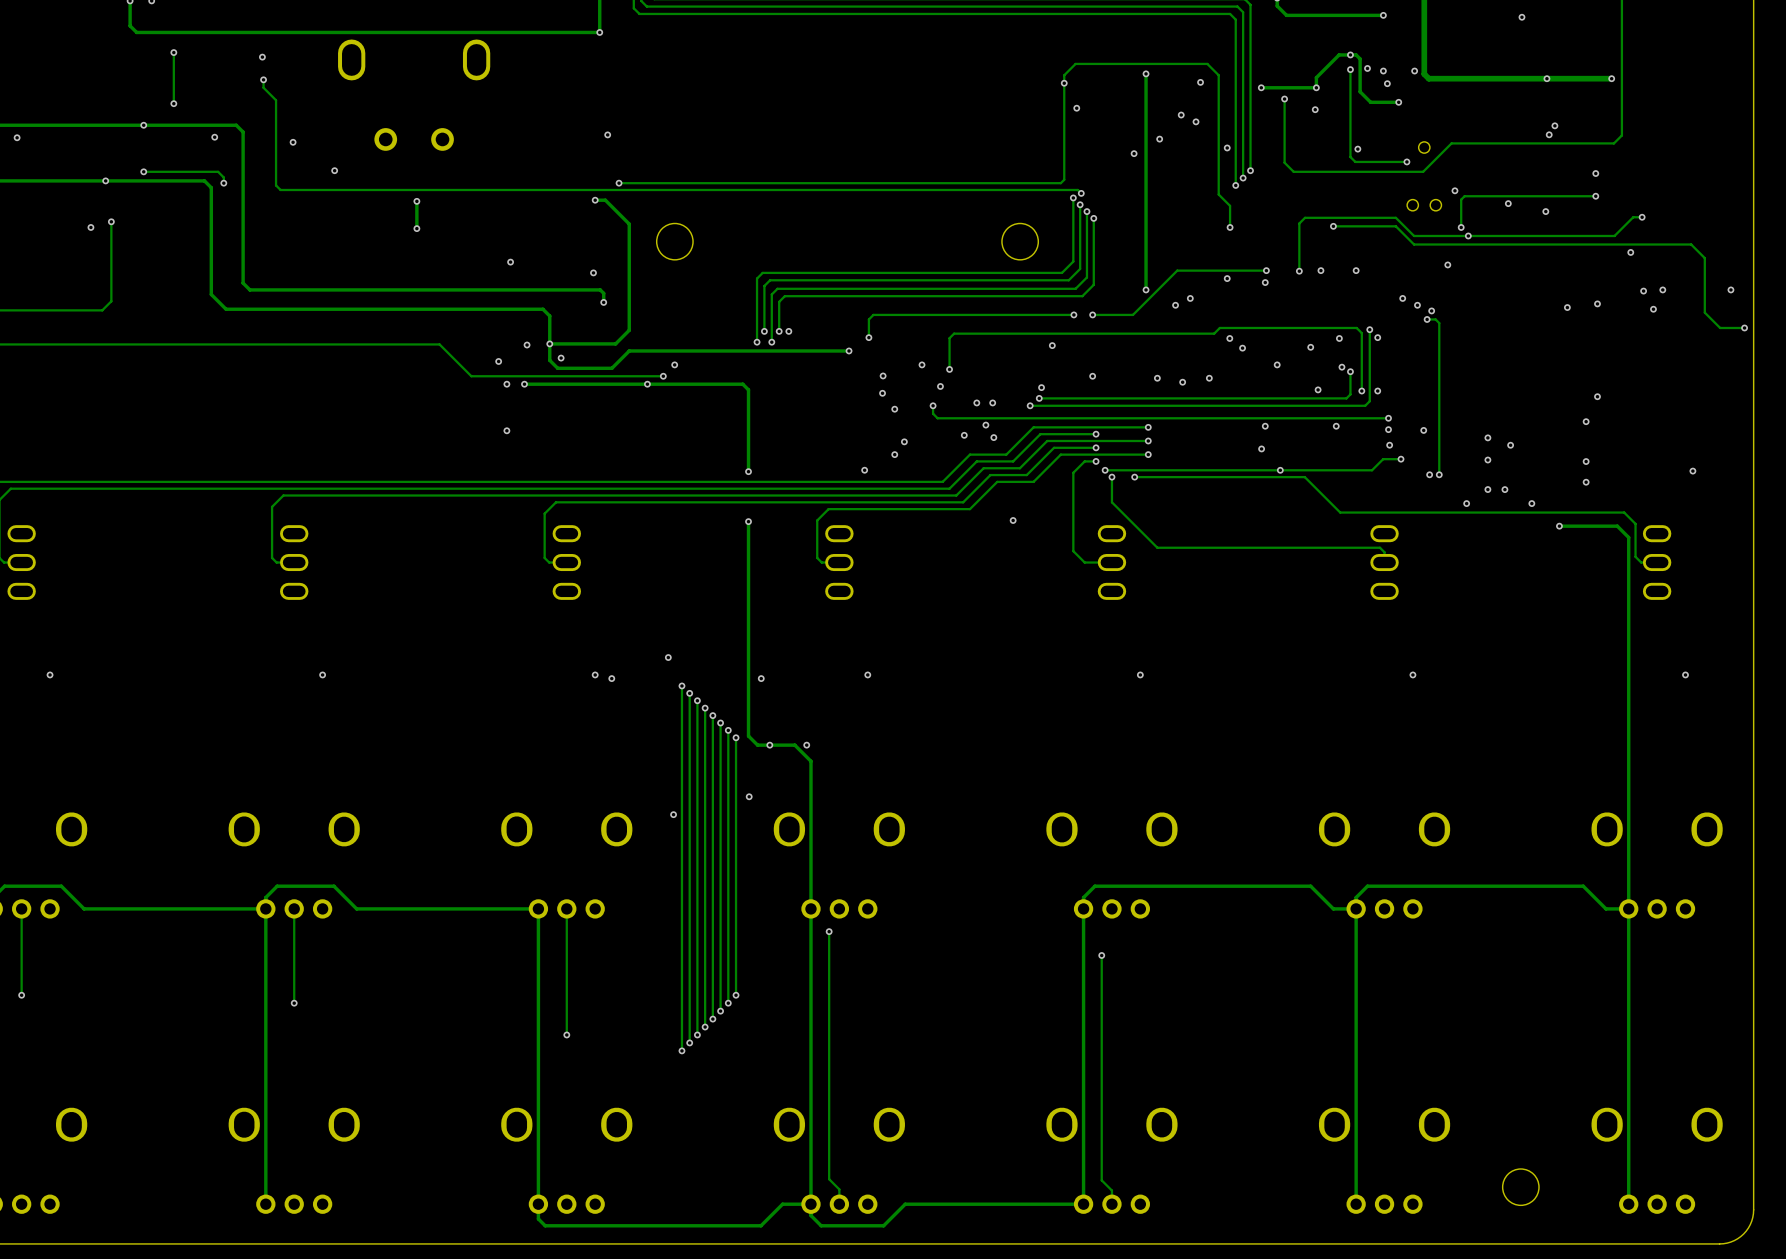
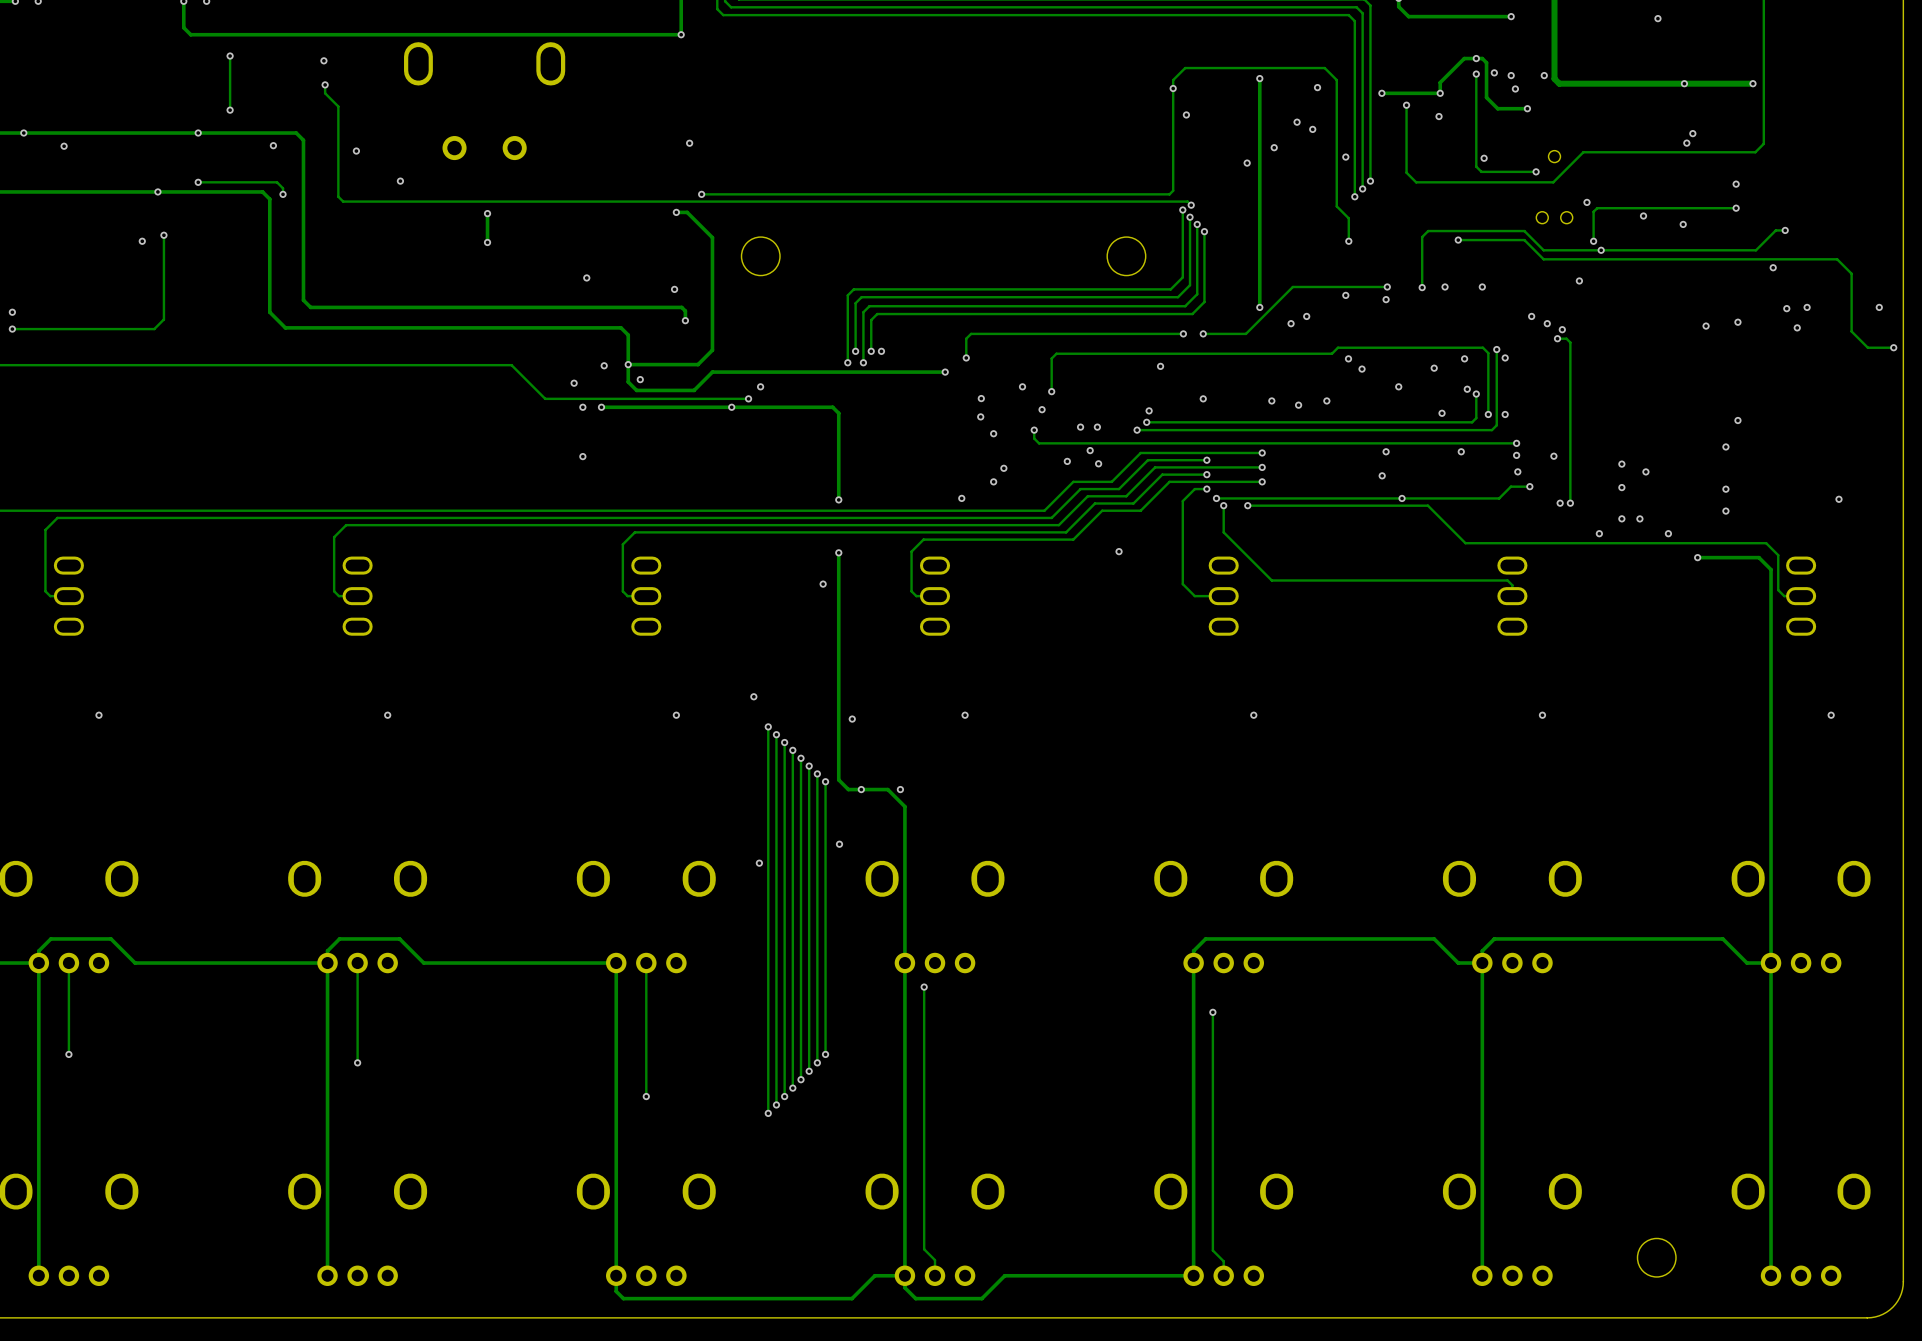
via: none -> (823, 584)
via: (611, 678) -> none

